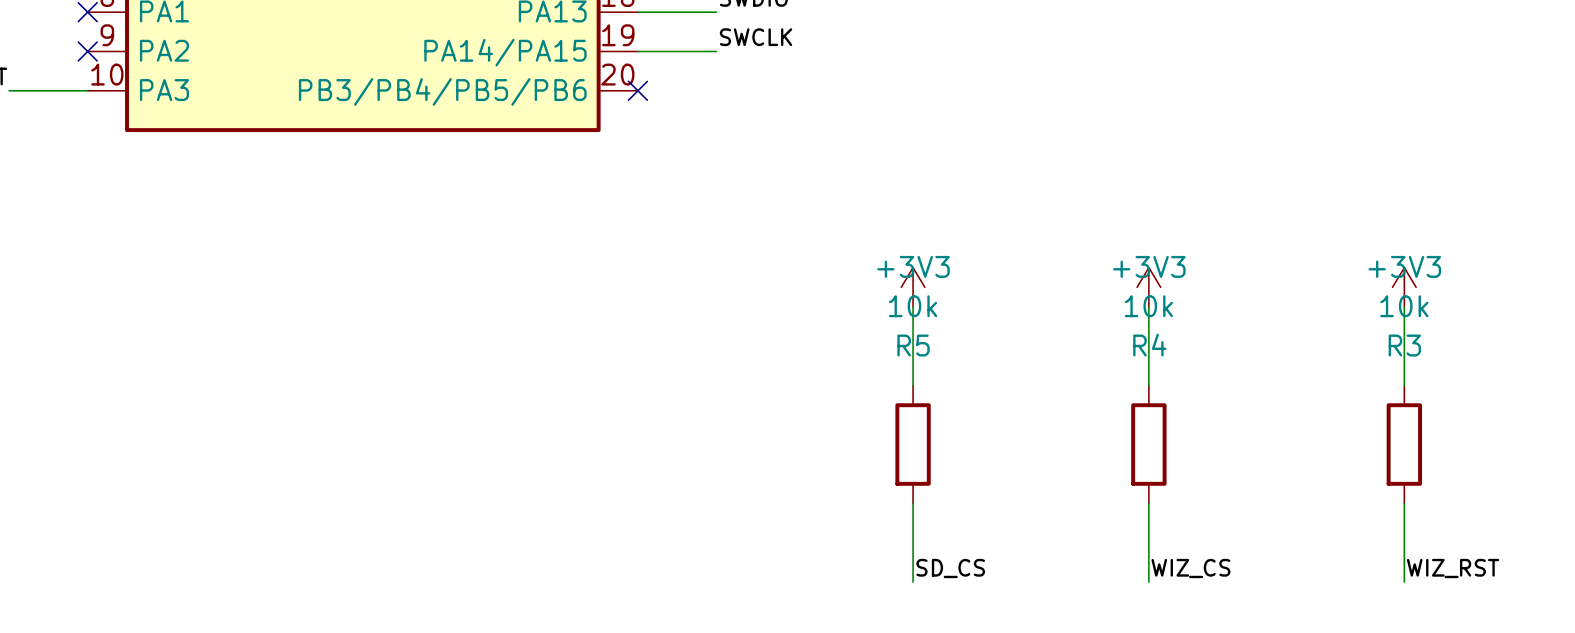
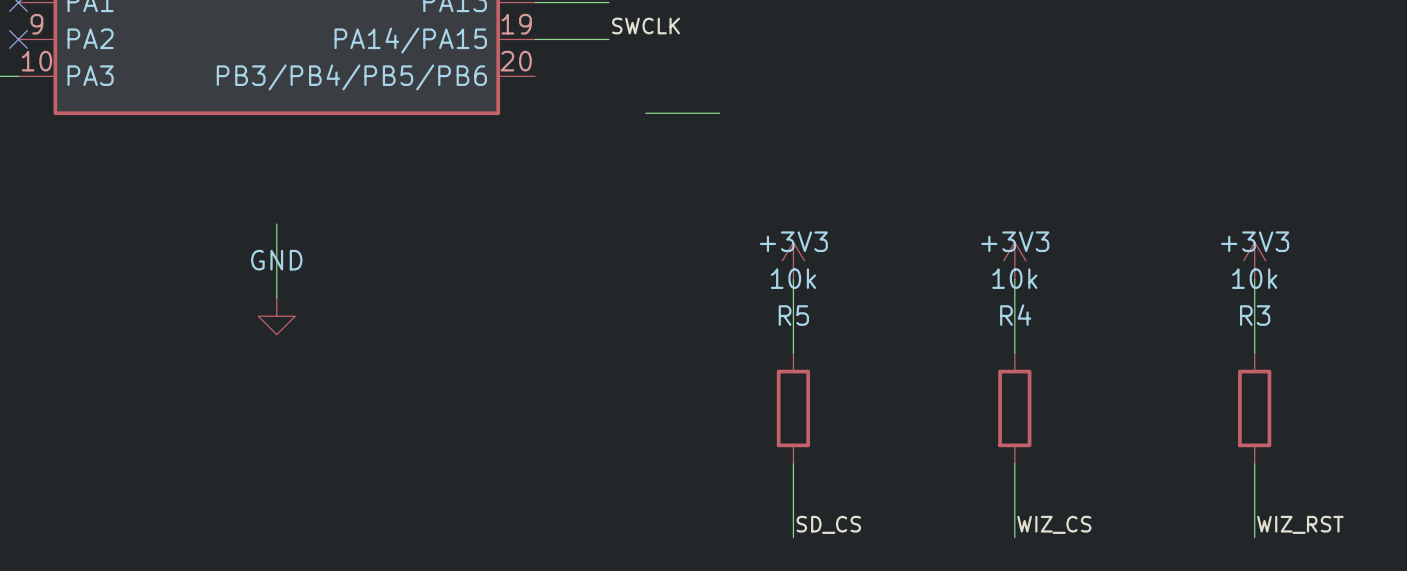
no-connect mark: (637, 90) -> none
wire: none -> (645, 113) (719, 113)
wire: none -> (276, 223) (276, 297)
power symbol: none -> GND (276, 316)

